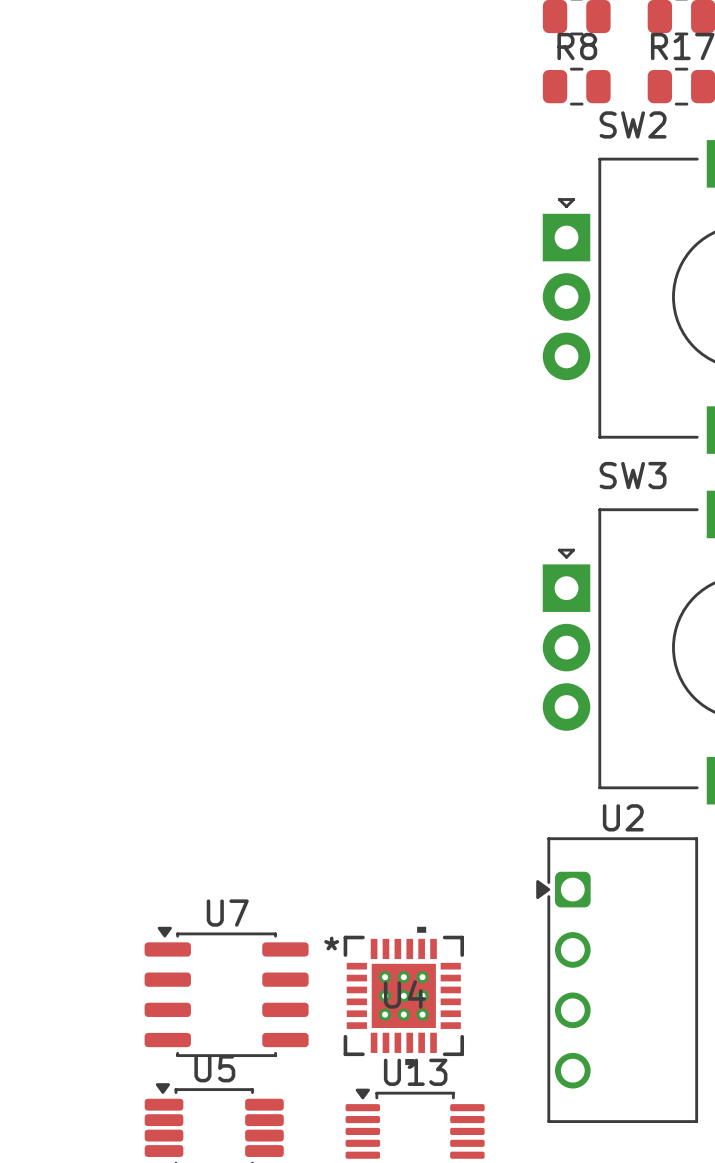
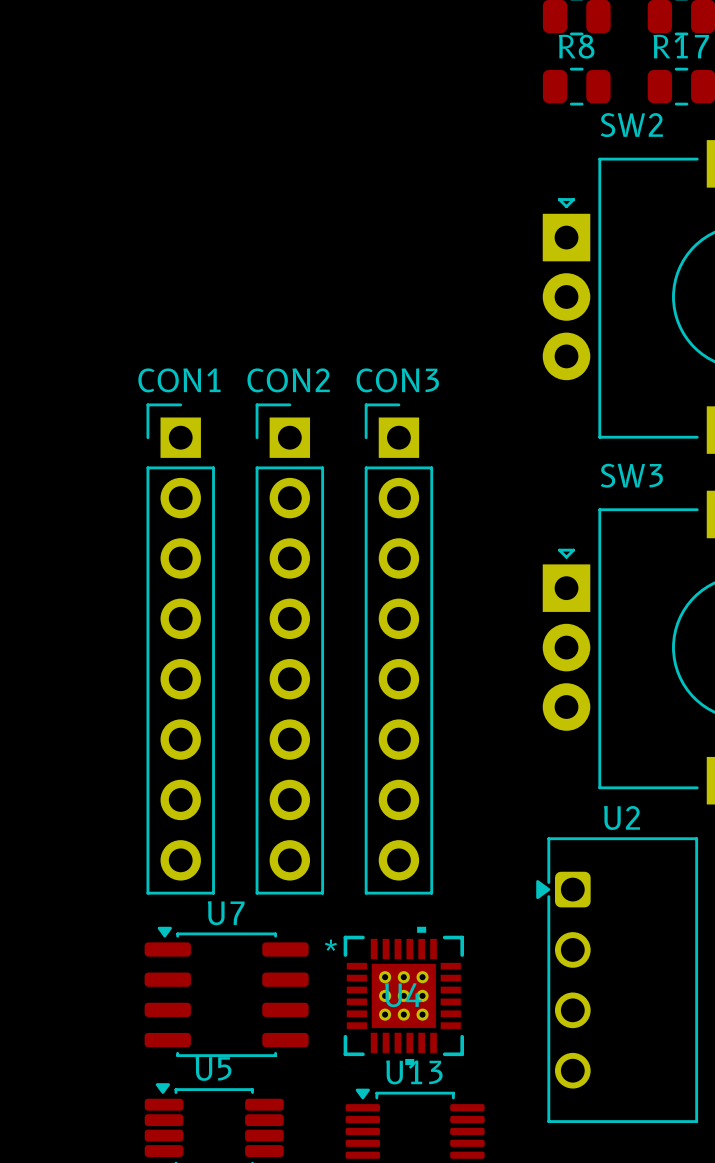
CON1: none -> (180, 649)
CON2: none -> (289, 649)
CON3: none -> (398, 649)

